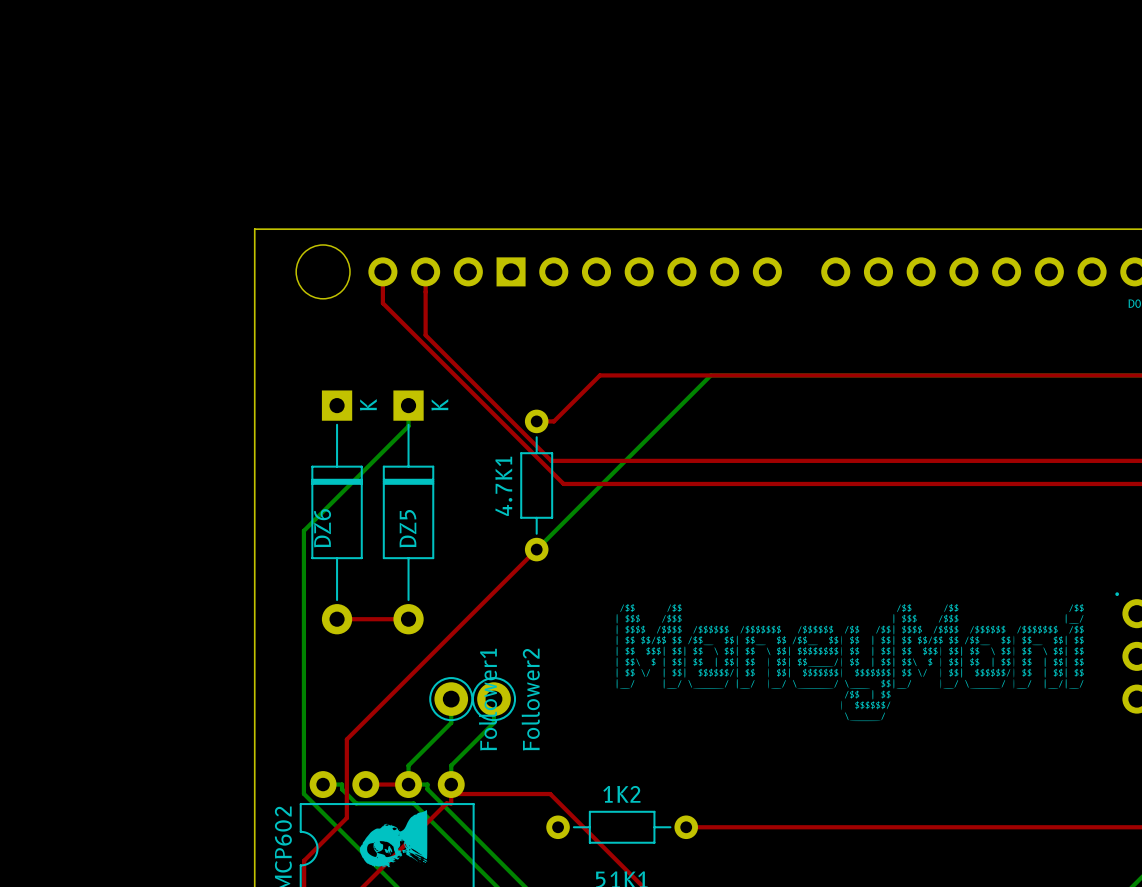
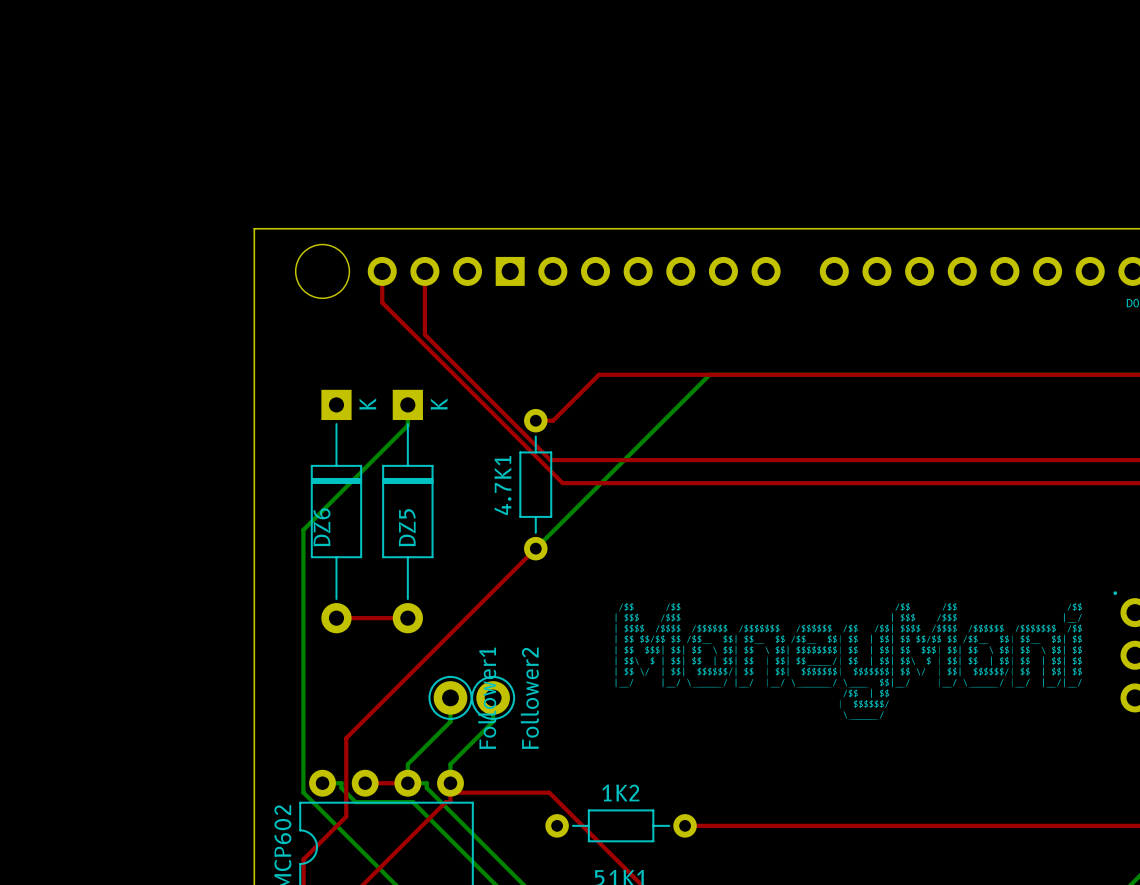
drawing: [359, 810, 428, 868] -> none

